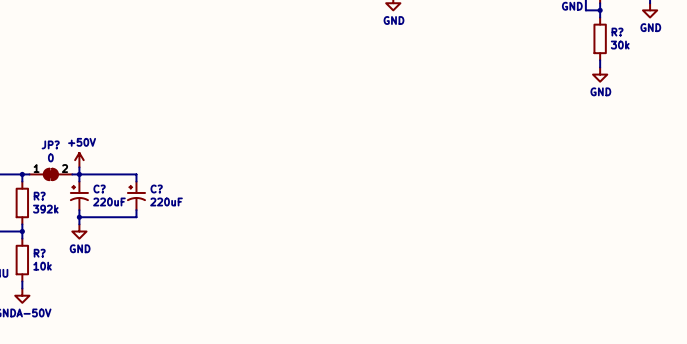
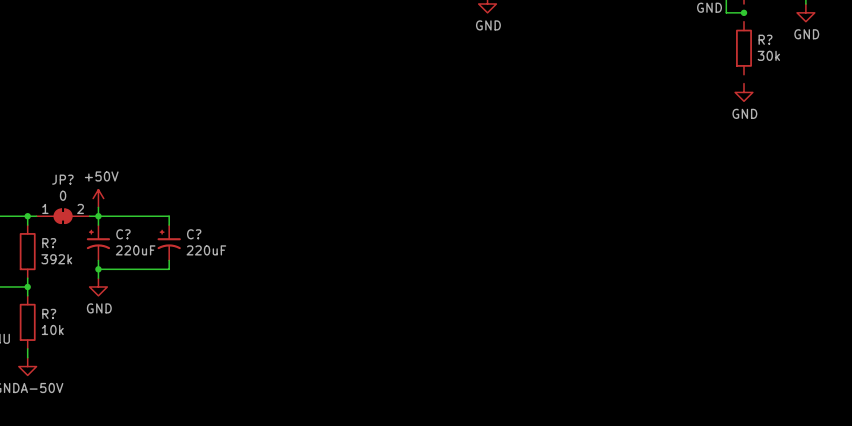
wire: (600, 3) (600, 17) -> none
wire: (600, 60) (600, 67) -> none

